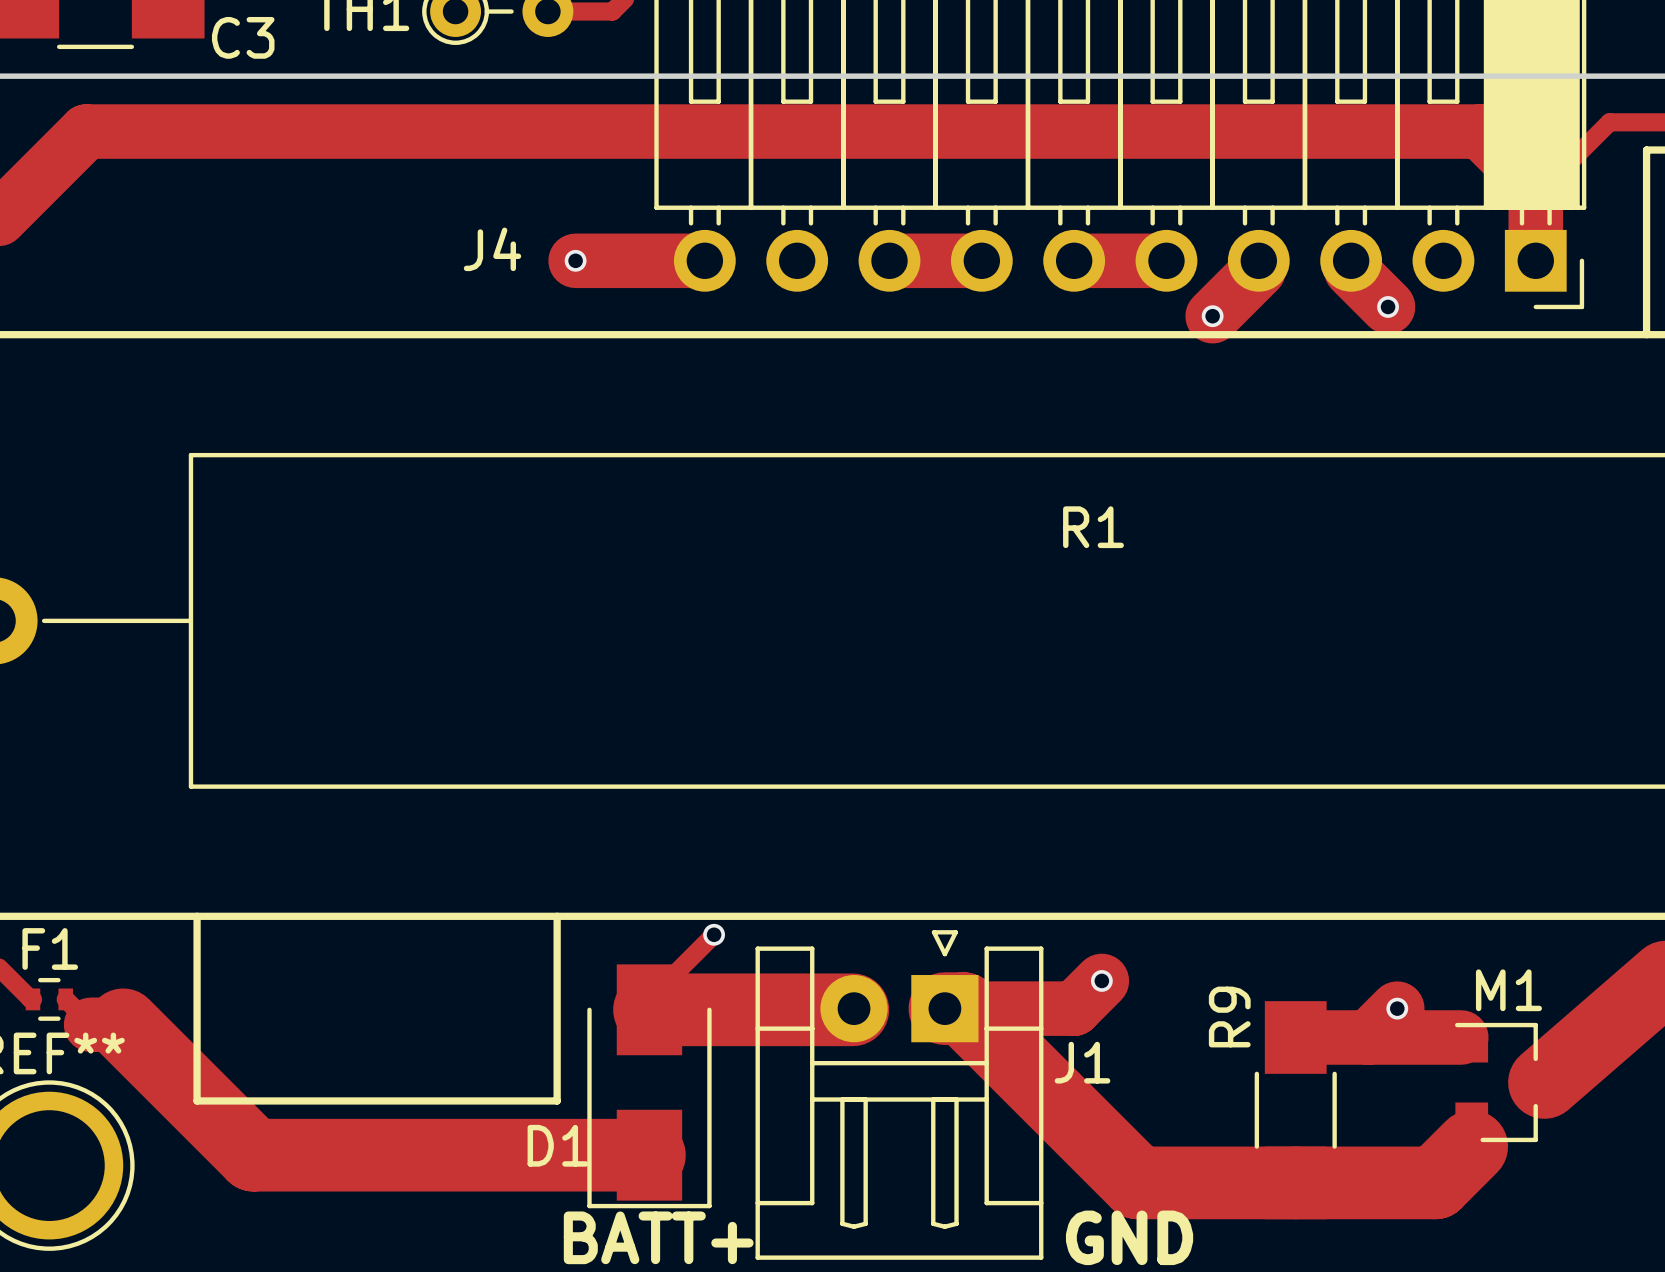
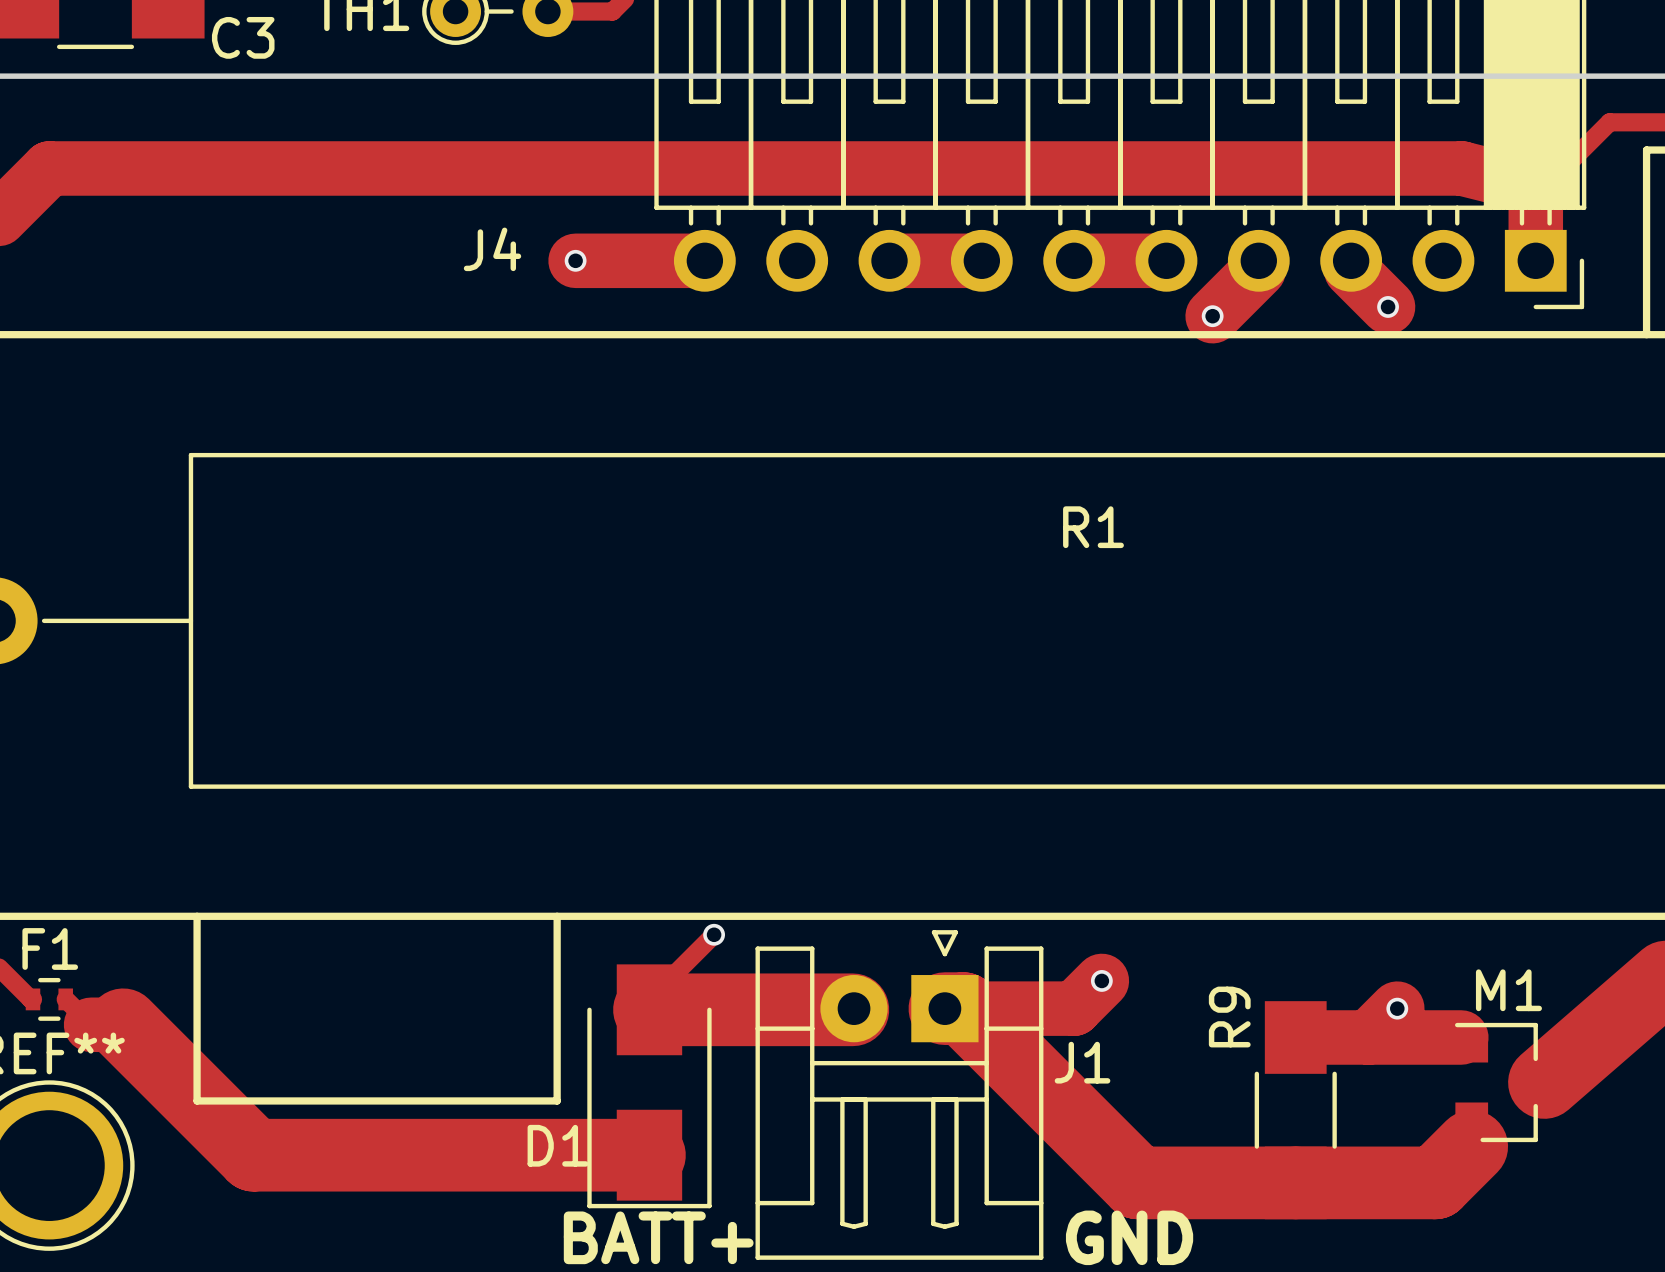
track: (49, 168) (86, 131) (1480, 131) (1535, 186) -> (49, 168) (1461, 168) (1535, 186)

